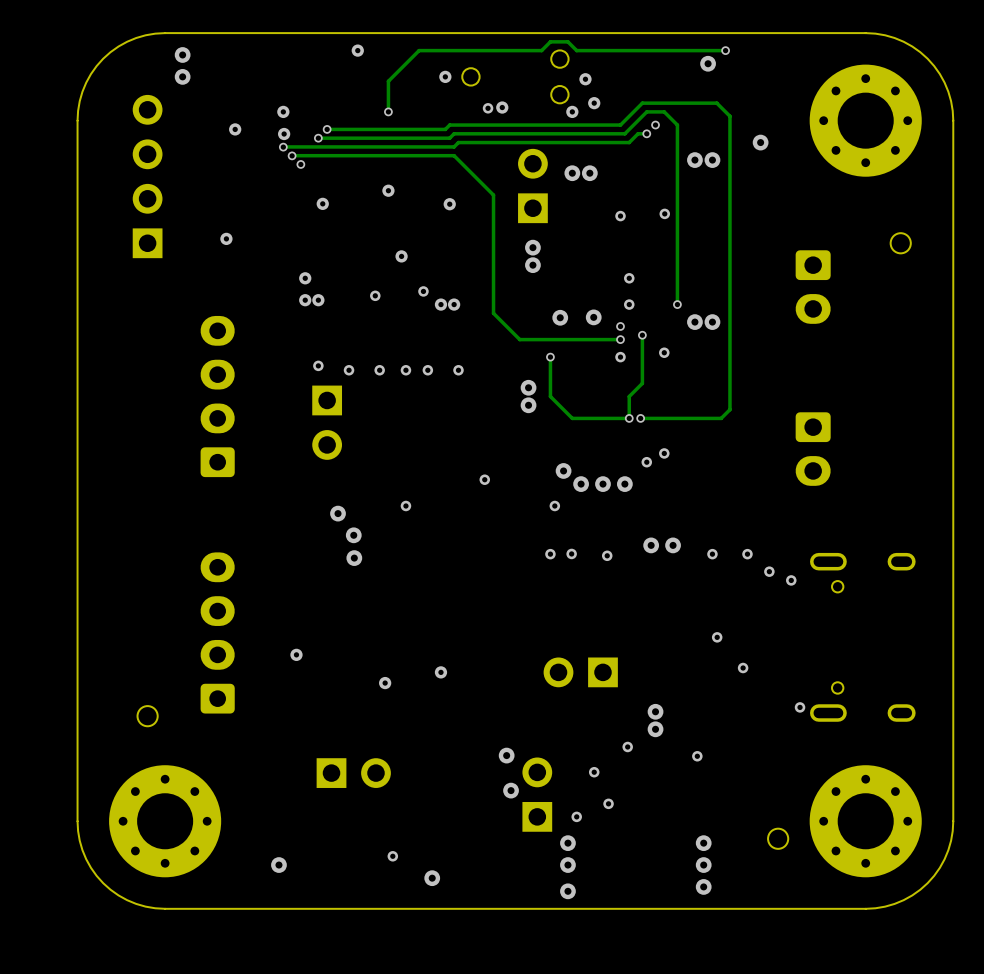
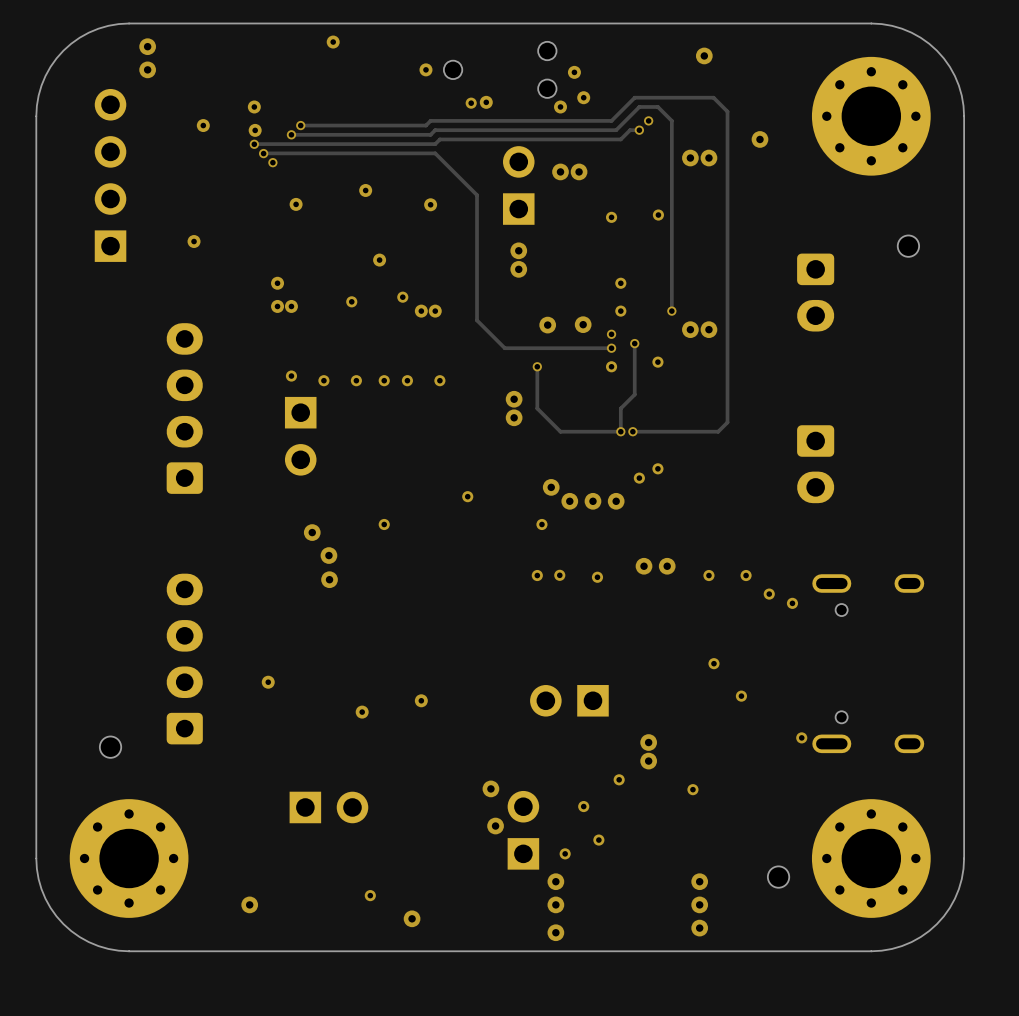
track: (725, 50) (576, 50) (567, 41) (550, 41) (541, 50) (419, 50) (388, 81) (388, 111) -> none
via: (725, 50) -> none
via: (388, 111) -> none

